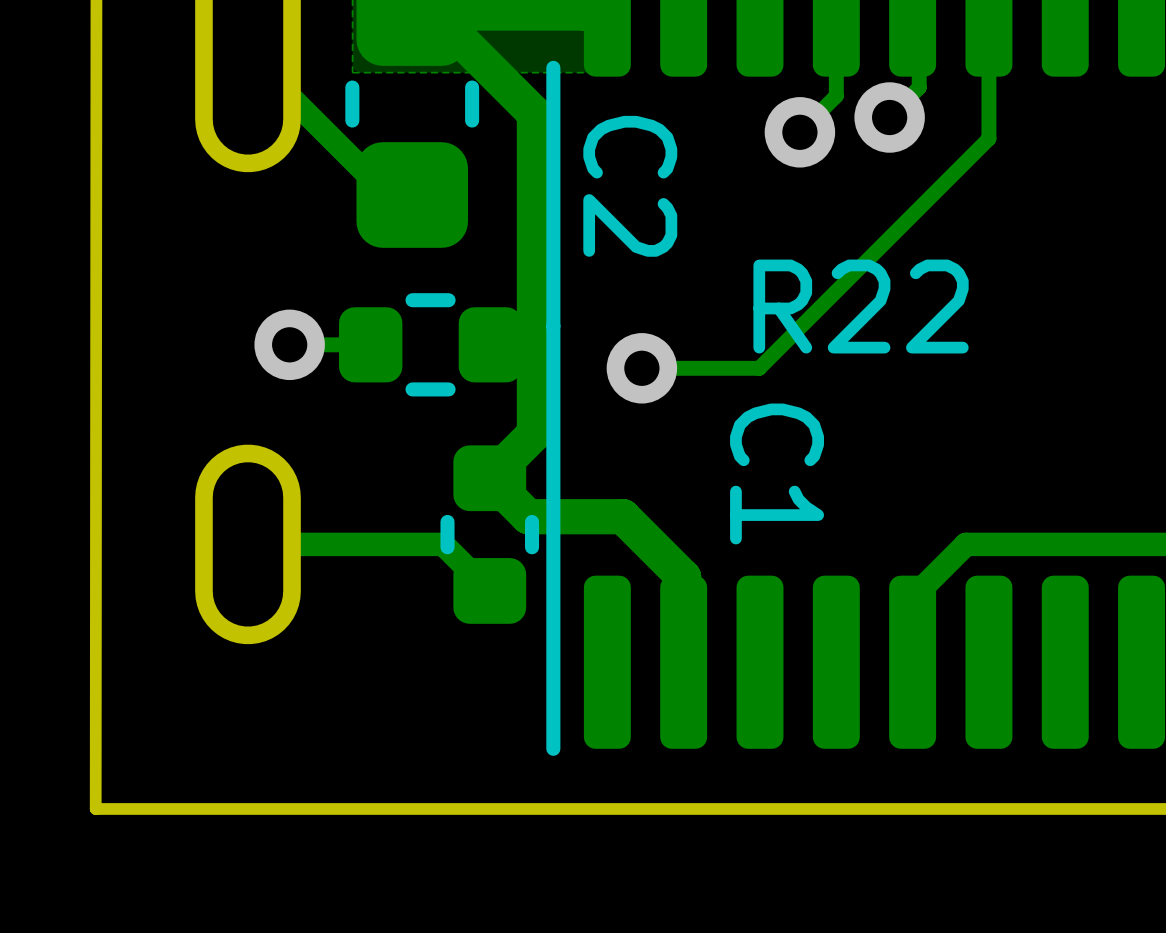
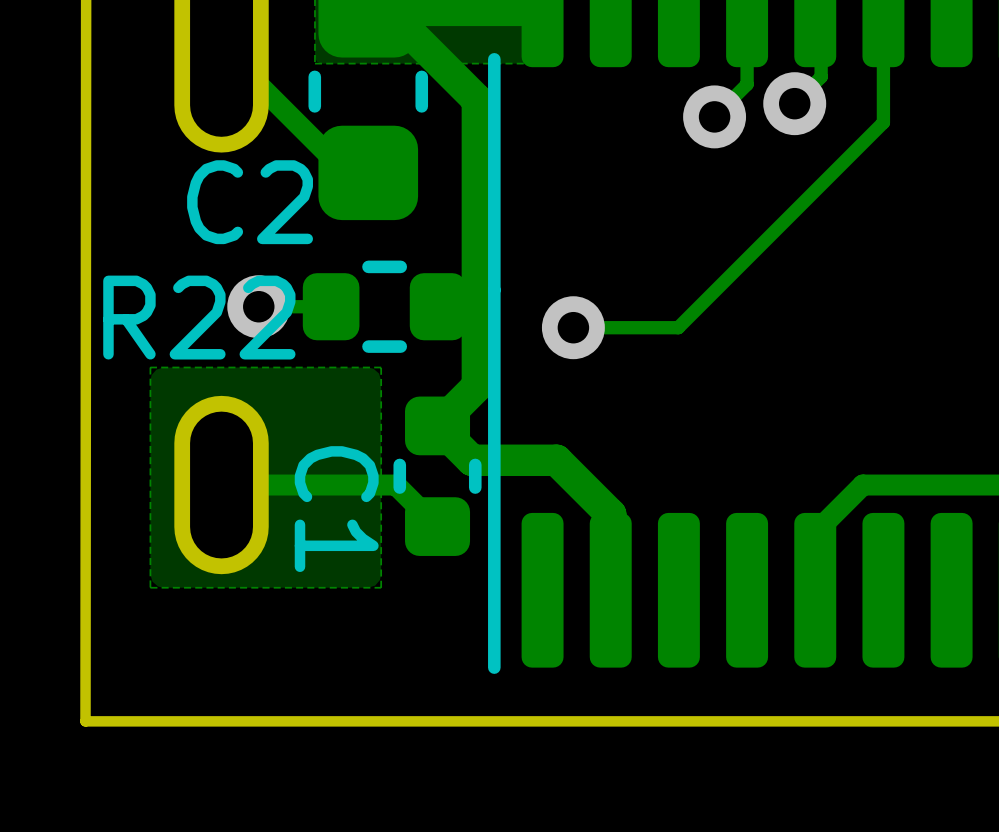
C2 name rotation: 0° (630, 186) -> 90° counterclockwise (250, 202)
C2 name position: C2 (630, 186) -> C2 (250, 202)
R22 name position: R22 (861, 306) -> R22 (199, 317)
zone outline: none -> (381, 367) (381, 587) (150, 587) (150, 367) (381, 367)
C1 name position: C1 (777, 473) -> C1 (336, 509)

